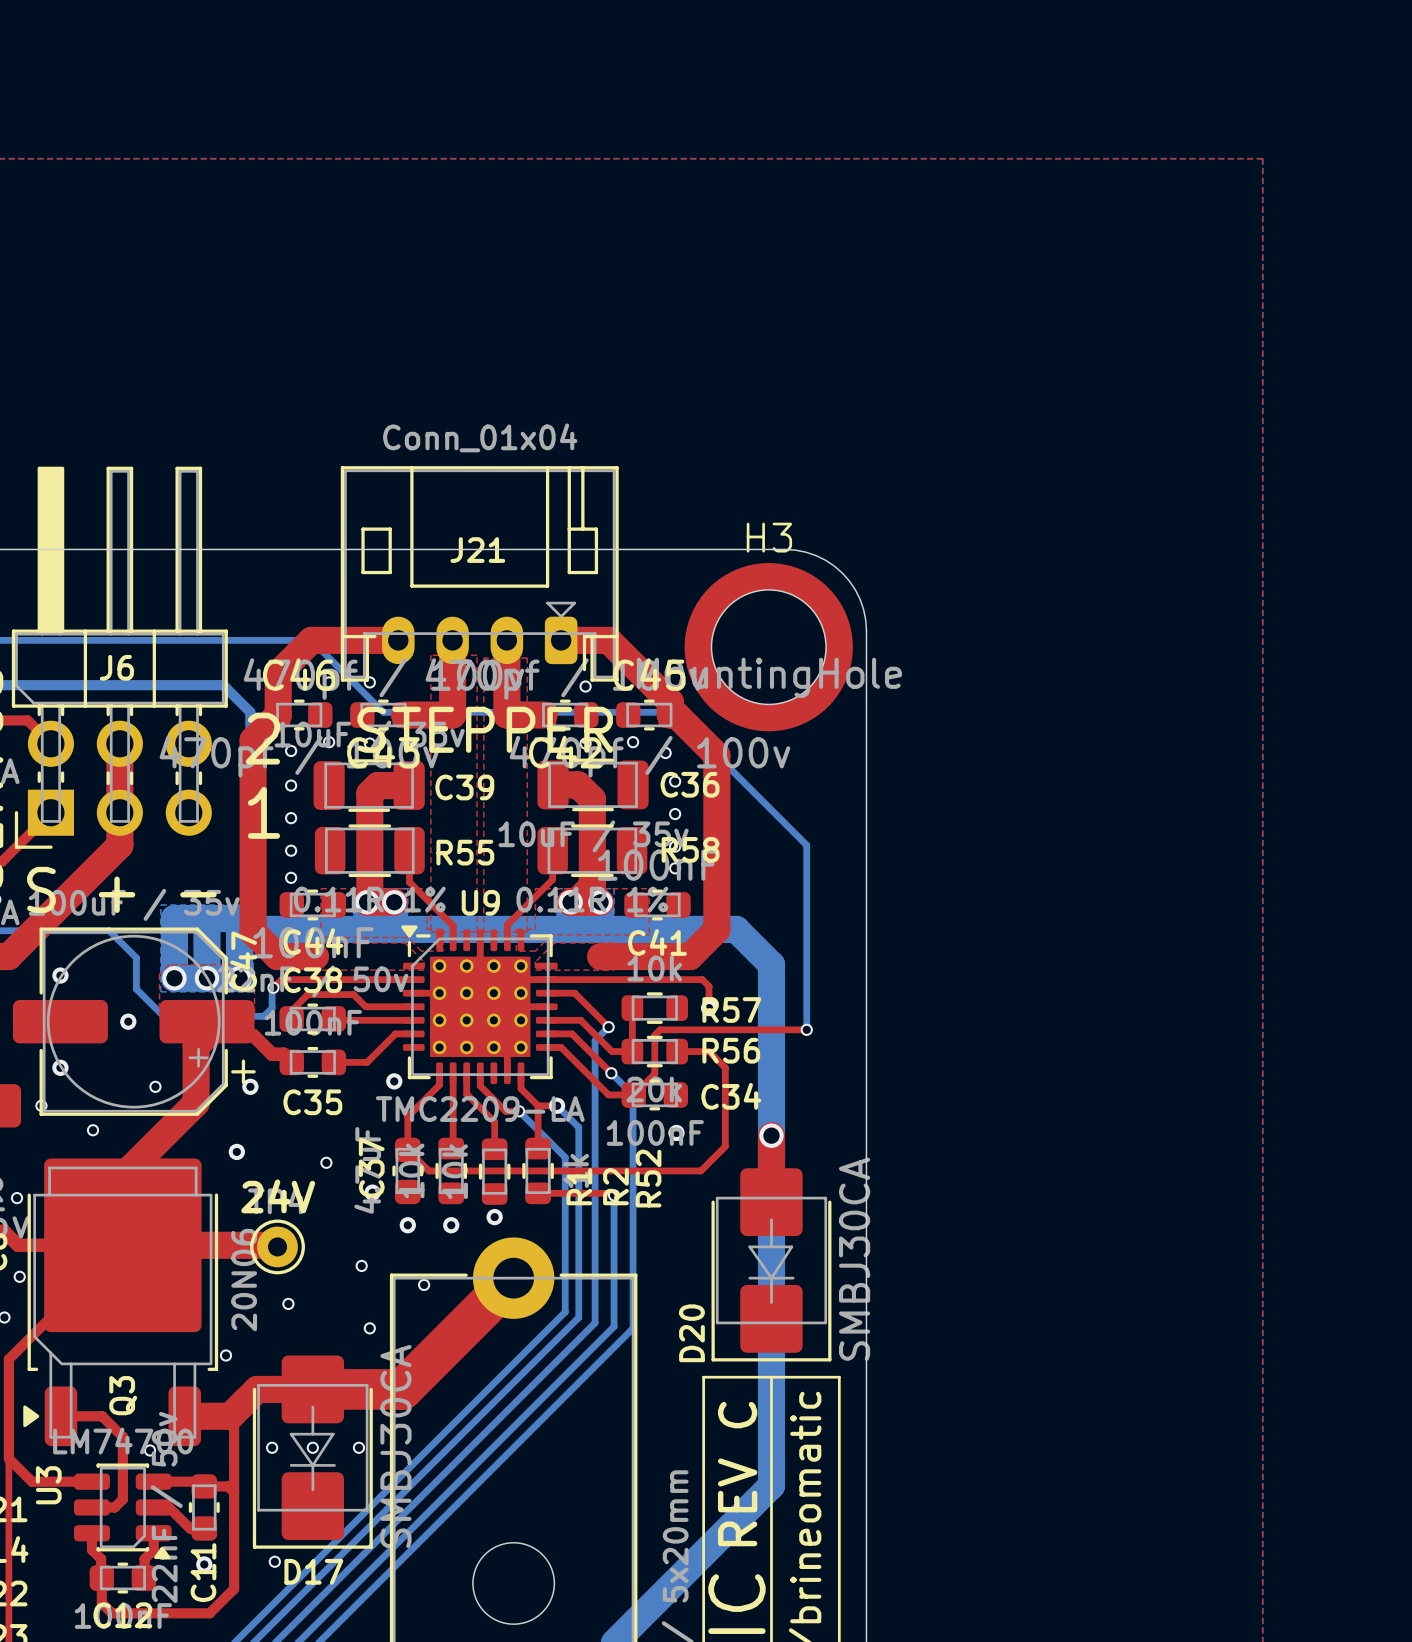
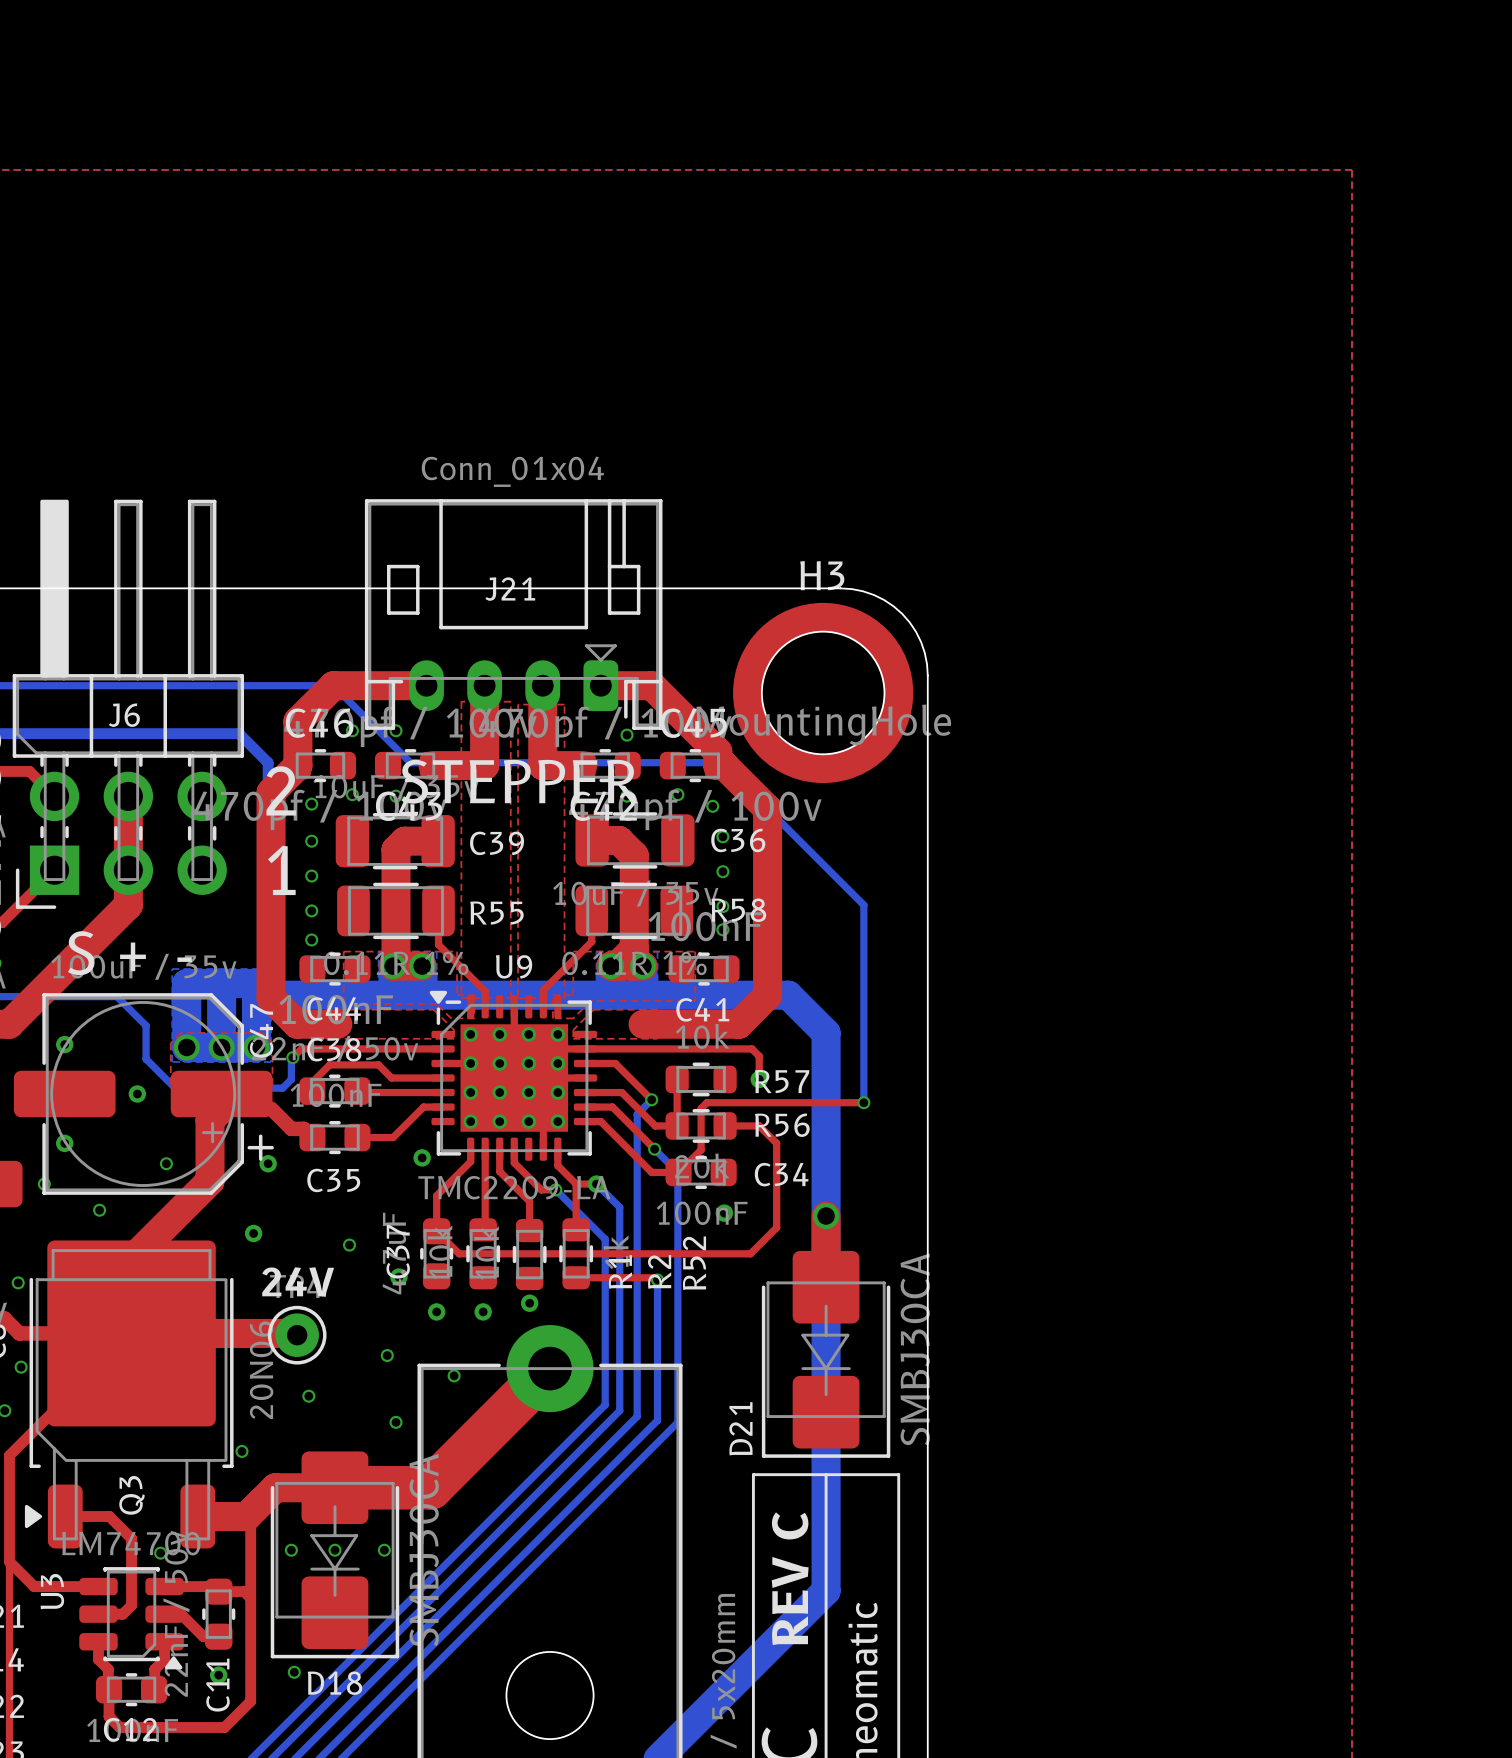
D20 name: D20 (691, 1333) -> D21 (740, 1428)
D17 name: D17 (313, 1571) -> D18 (334, 1683)

